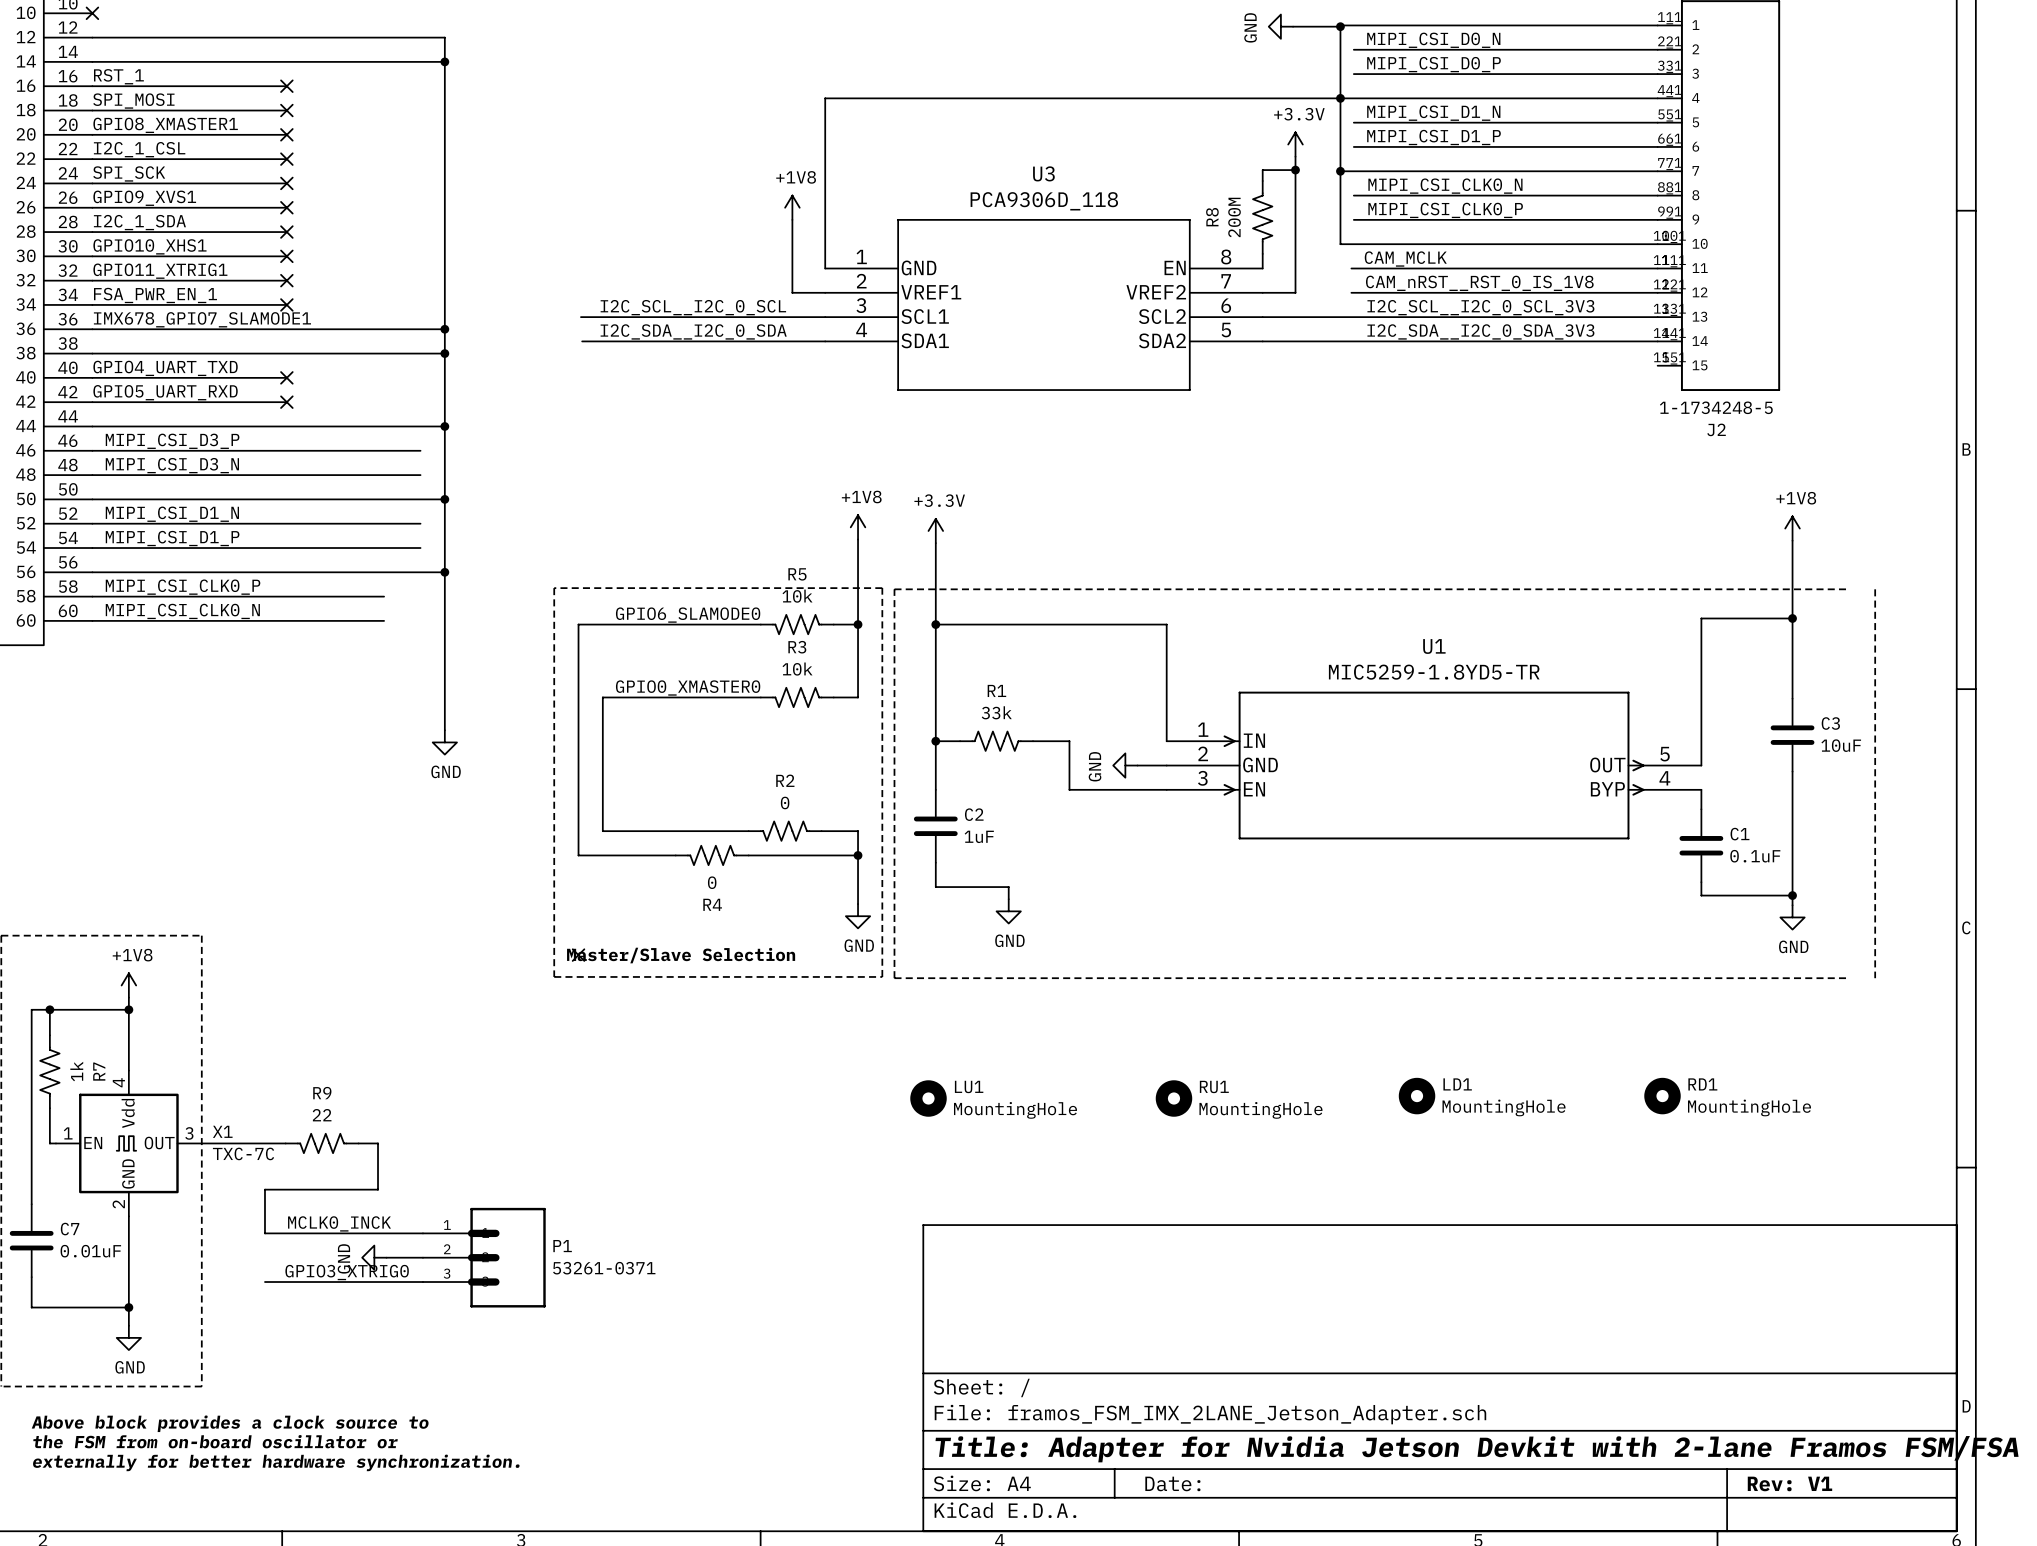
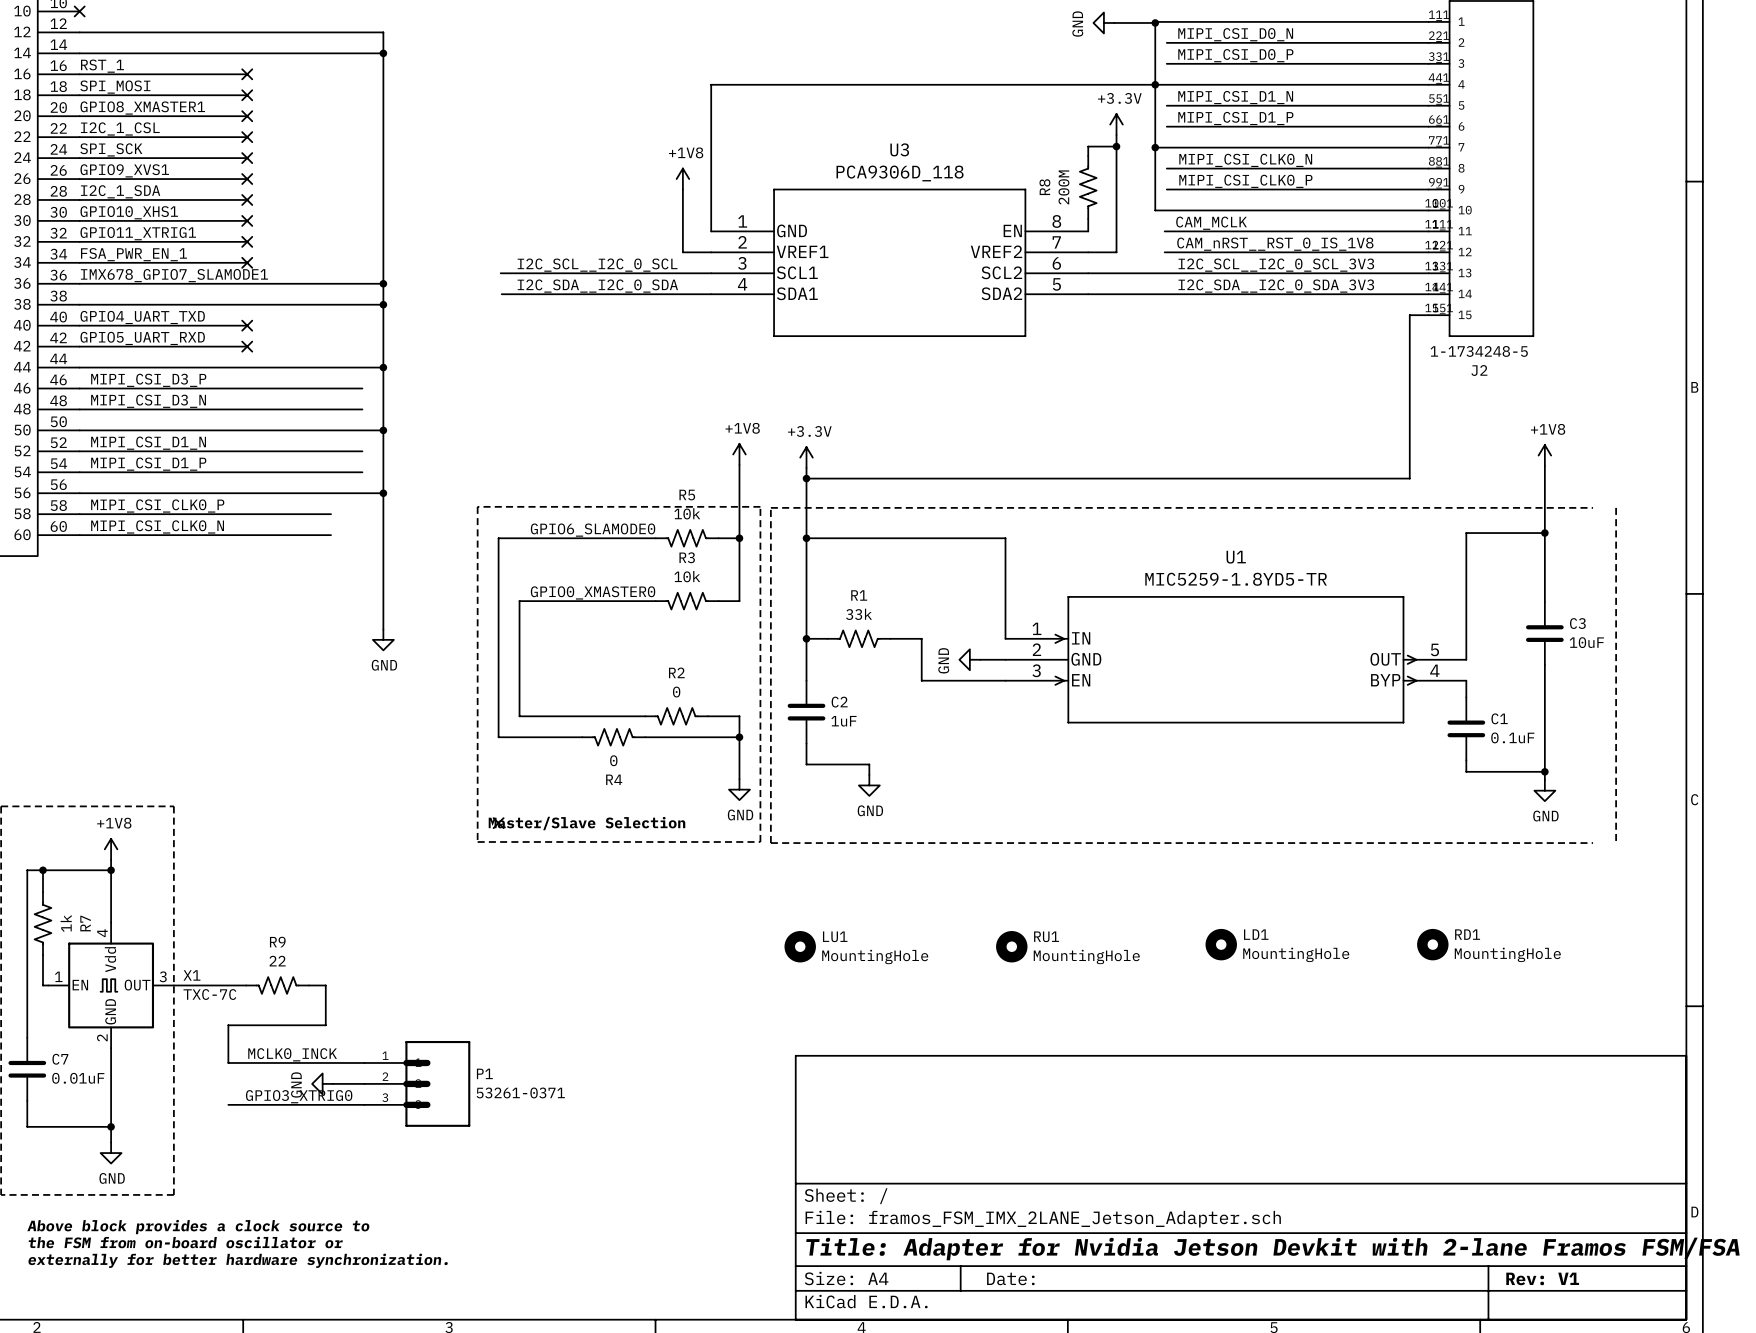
wire: none -> (1428, 315) (1409, 315) (1409, 478) (806, 478)
junction: none -> (806, 478)

